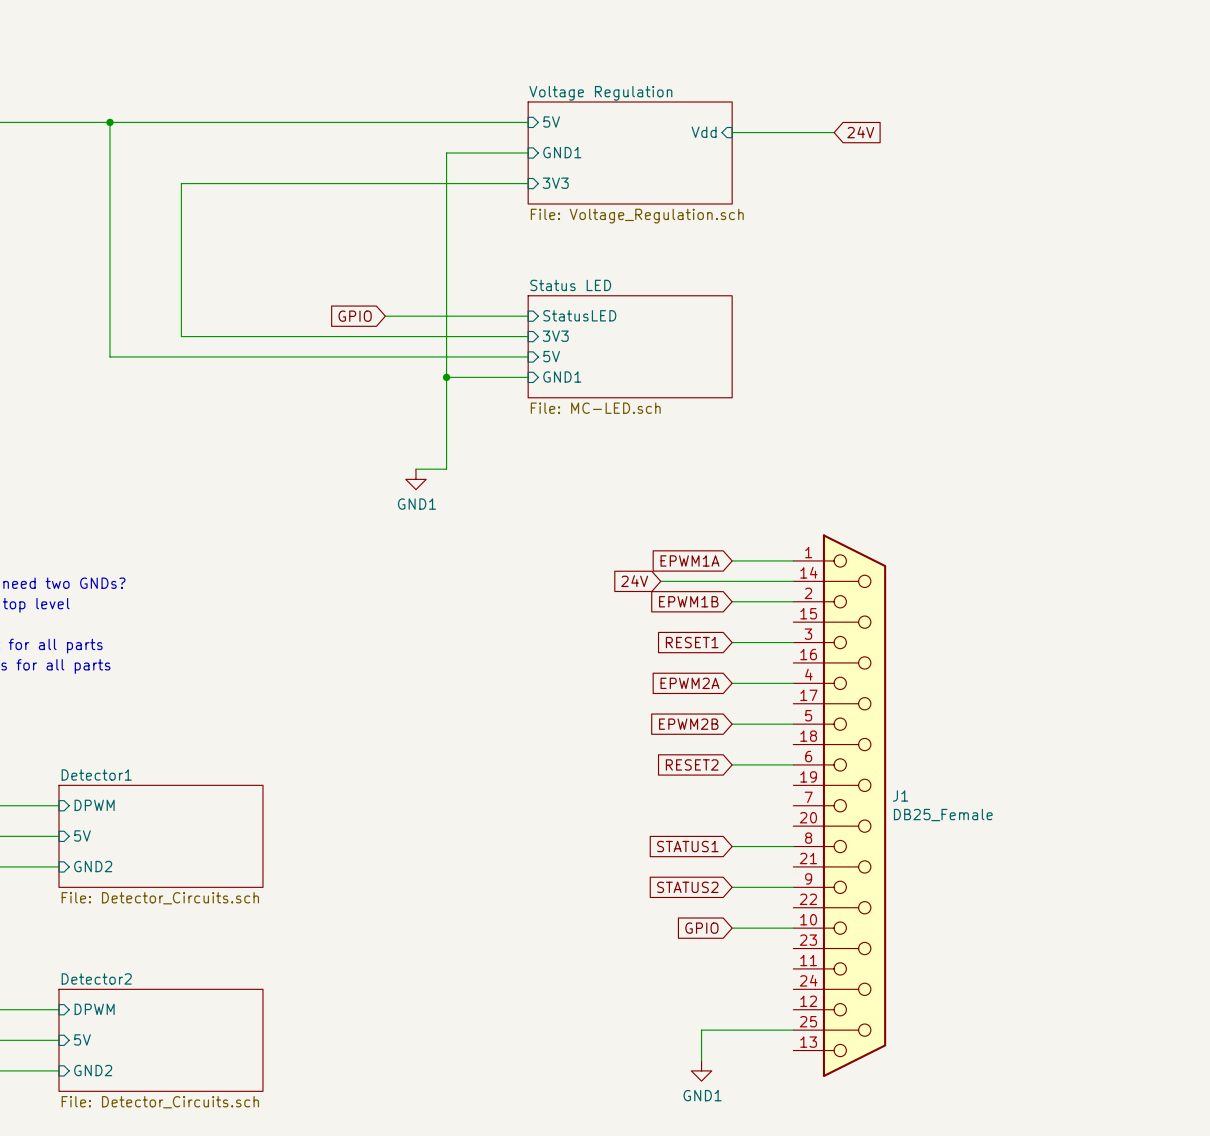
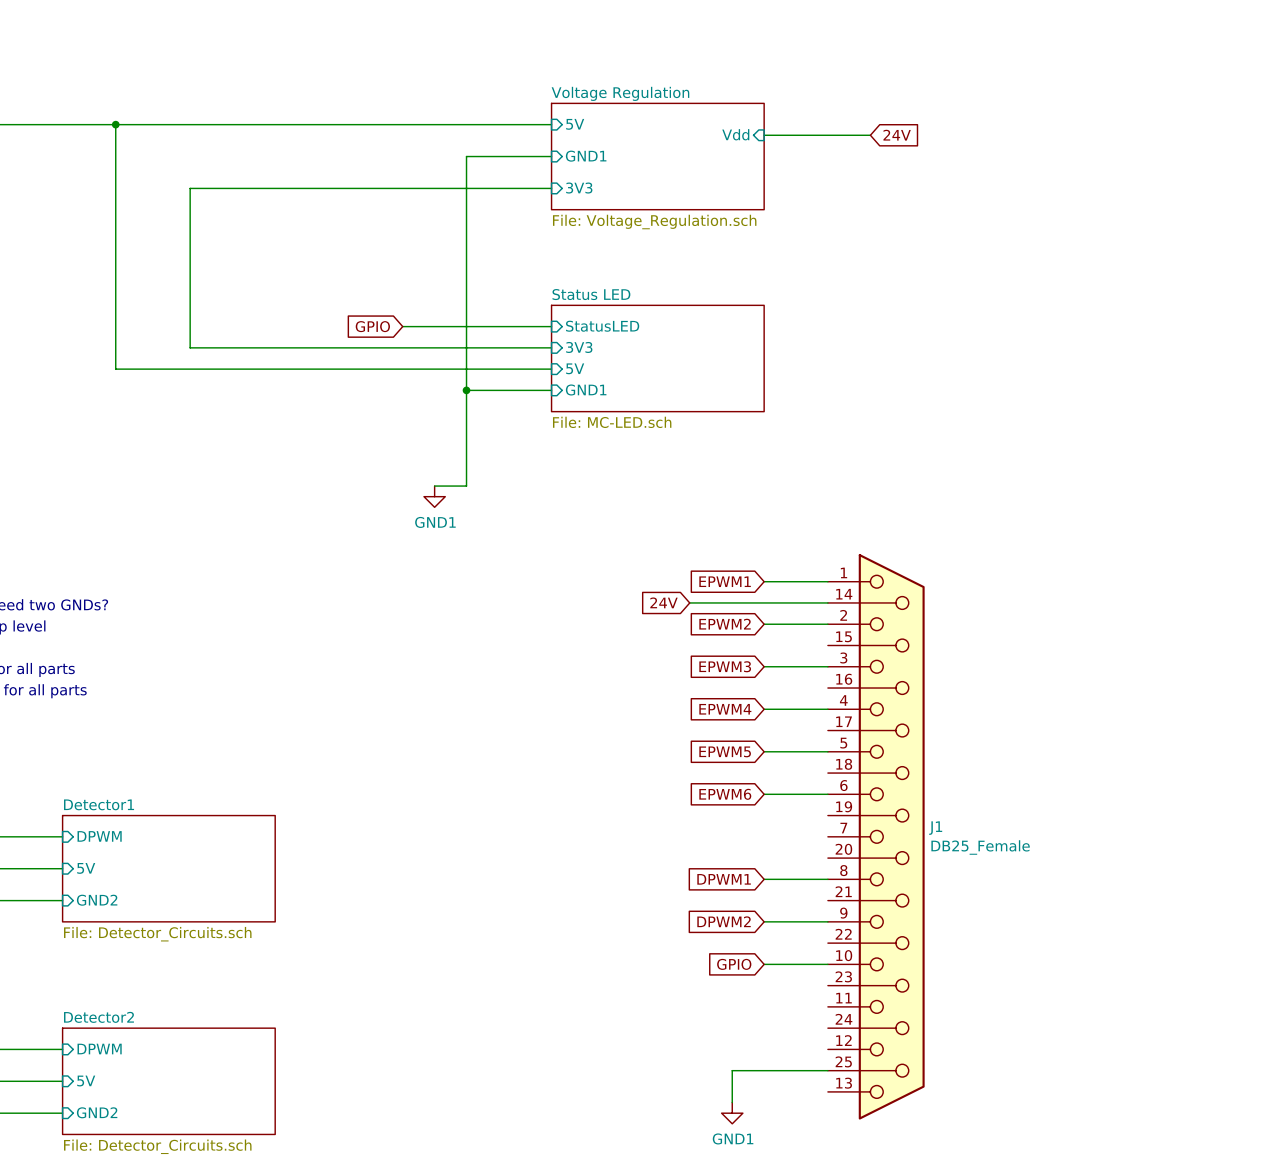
global label: EPWM1A (690, 560) -> EPWM1 (725, 581)
global label: EPWM1B (688, 601) -> EPWM2 (725, 624)
global label: RESET1 (692, 642) -> EPWM3 (725, 666)
global label: EPWM2A (690, 683) -> EPWM4 (725, 709)
global label: EPWM2B (688, 724) -> EPWM5 (725, 751)
global label: RESET2 (692, 764) -> EPWM6 (725, 794)
global label: STATUS1 (687, 846) -> DPWM1 (724, 879)
global label: STATUS2 (687, 887) -> DPWM2 (724, 921)

